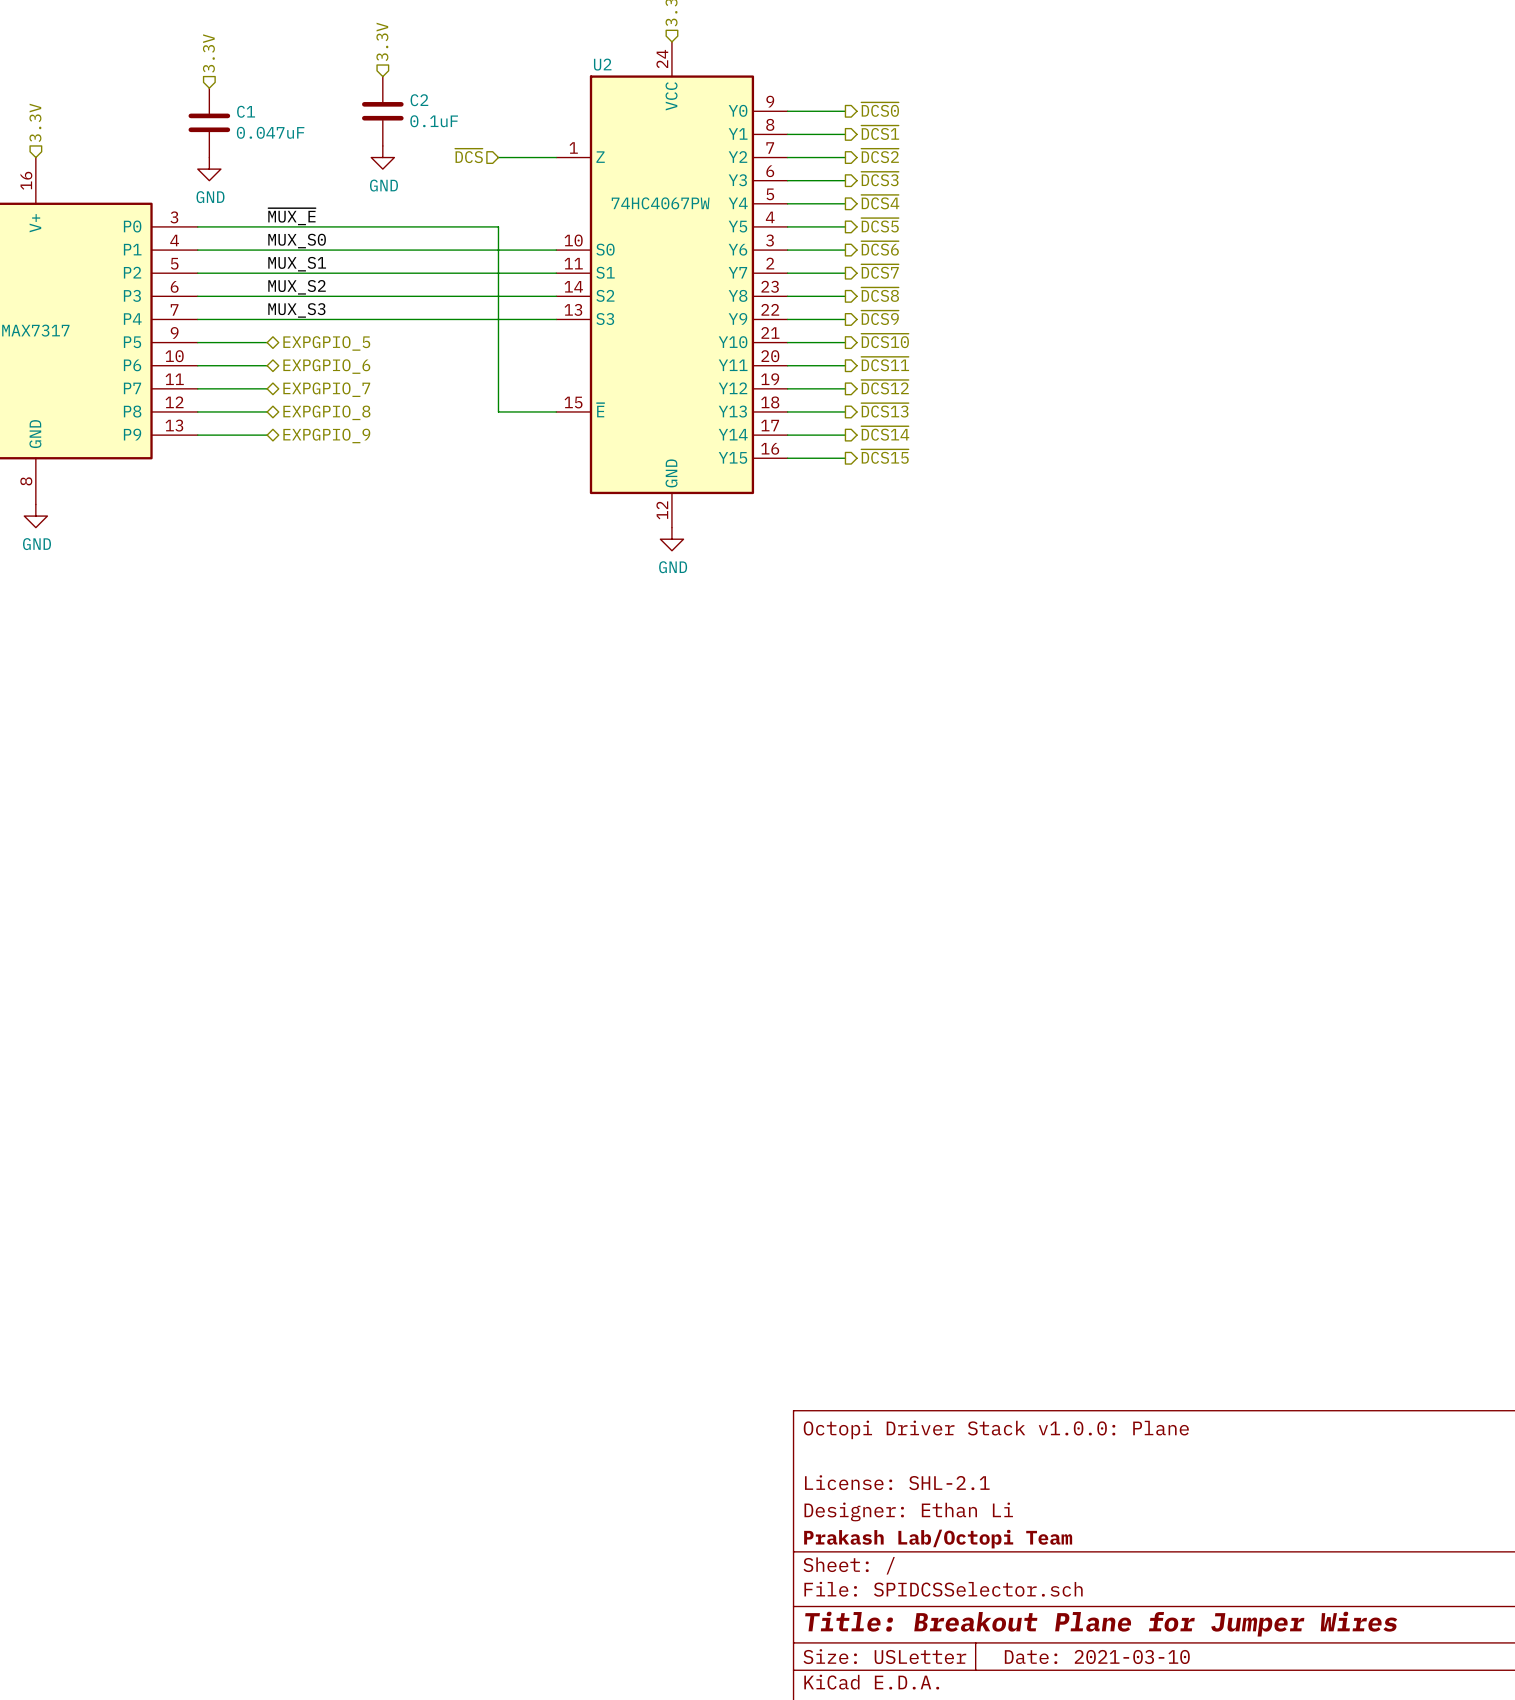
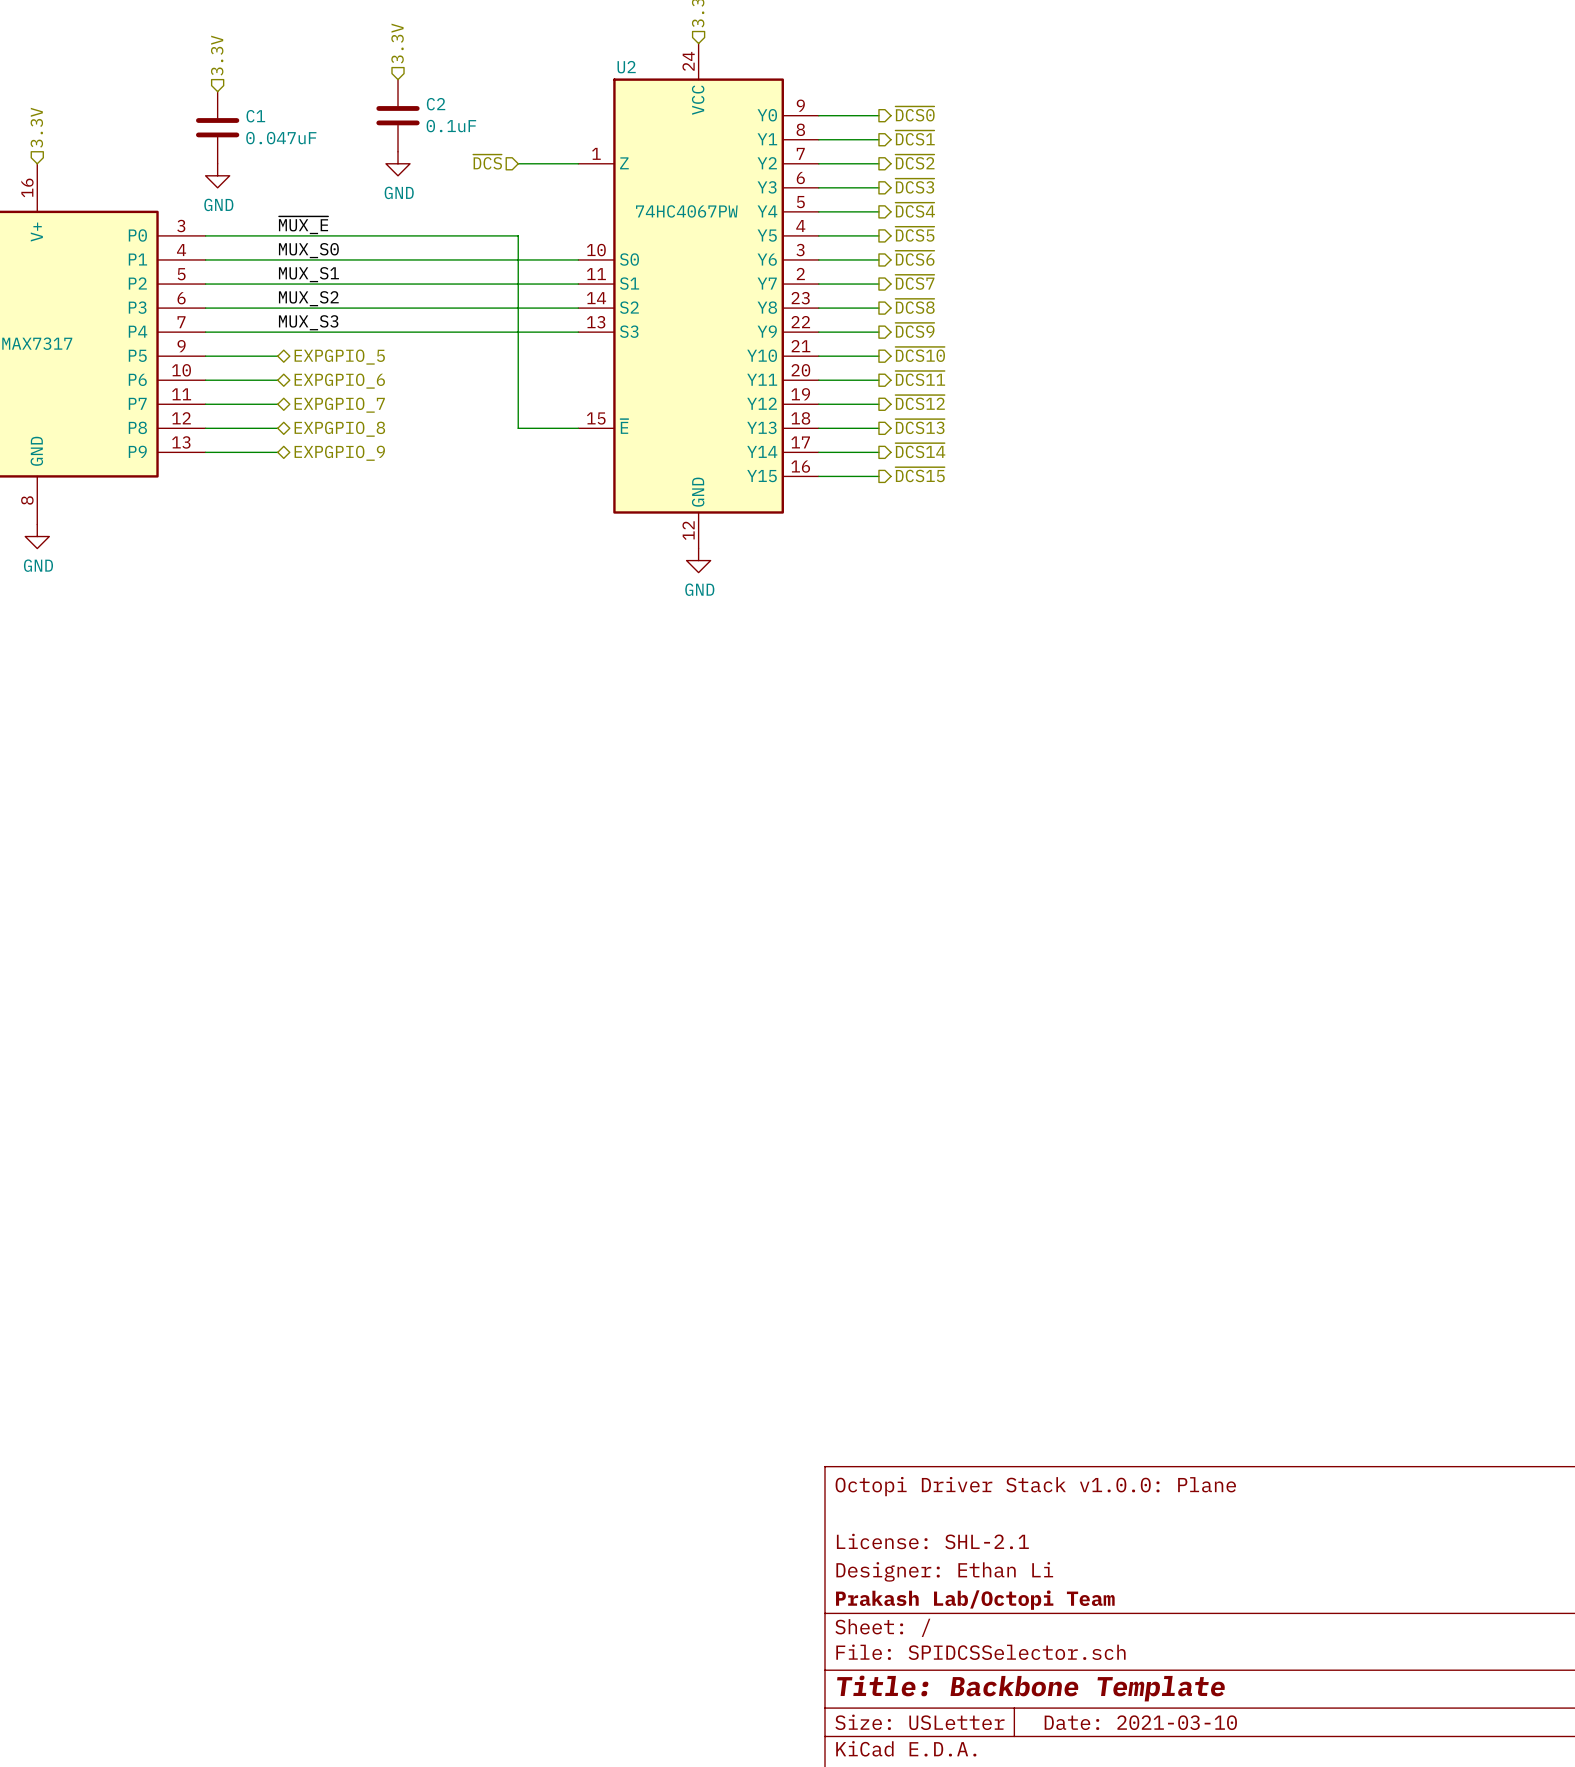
title block: Title: Breakout Plane for Jumper Wires (1101, 1624) -> Title: Backbone Template (1030, 1688)

